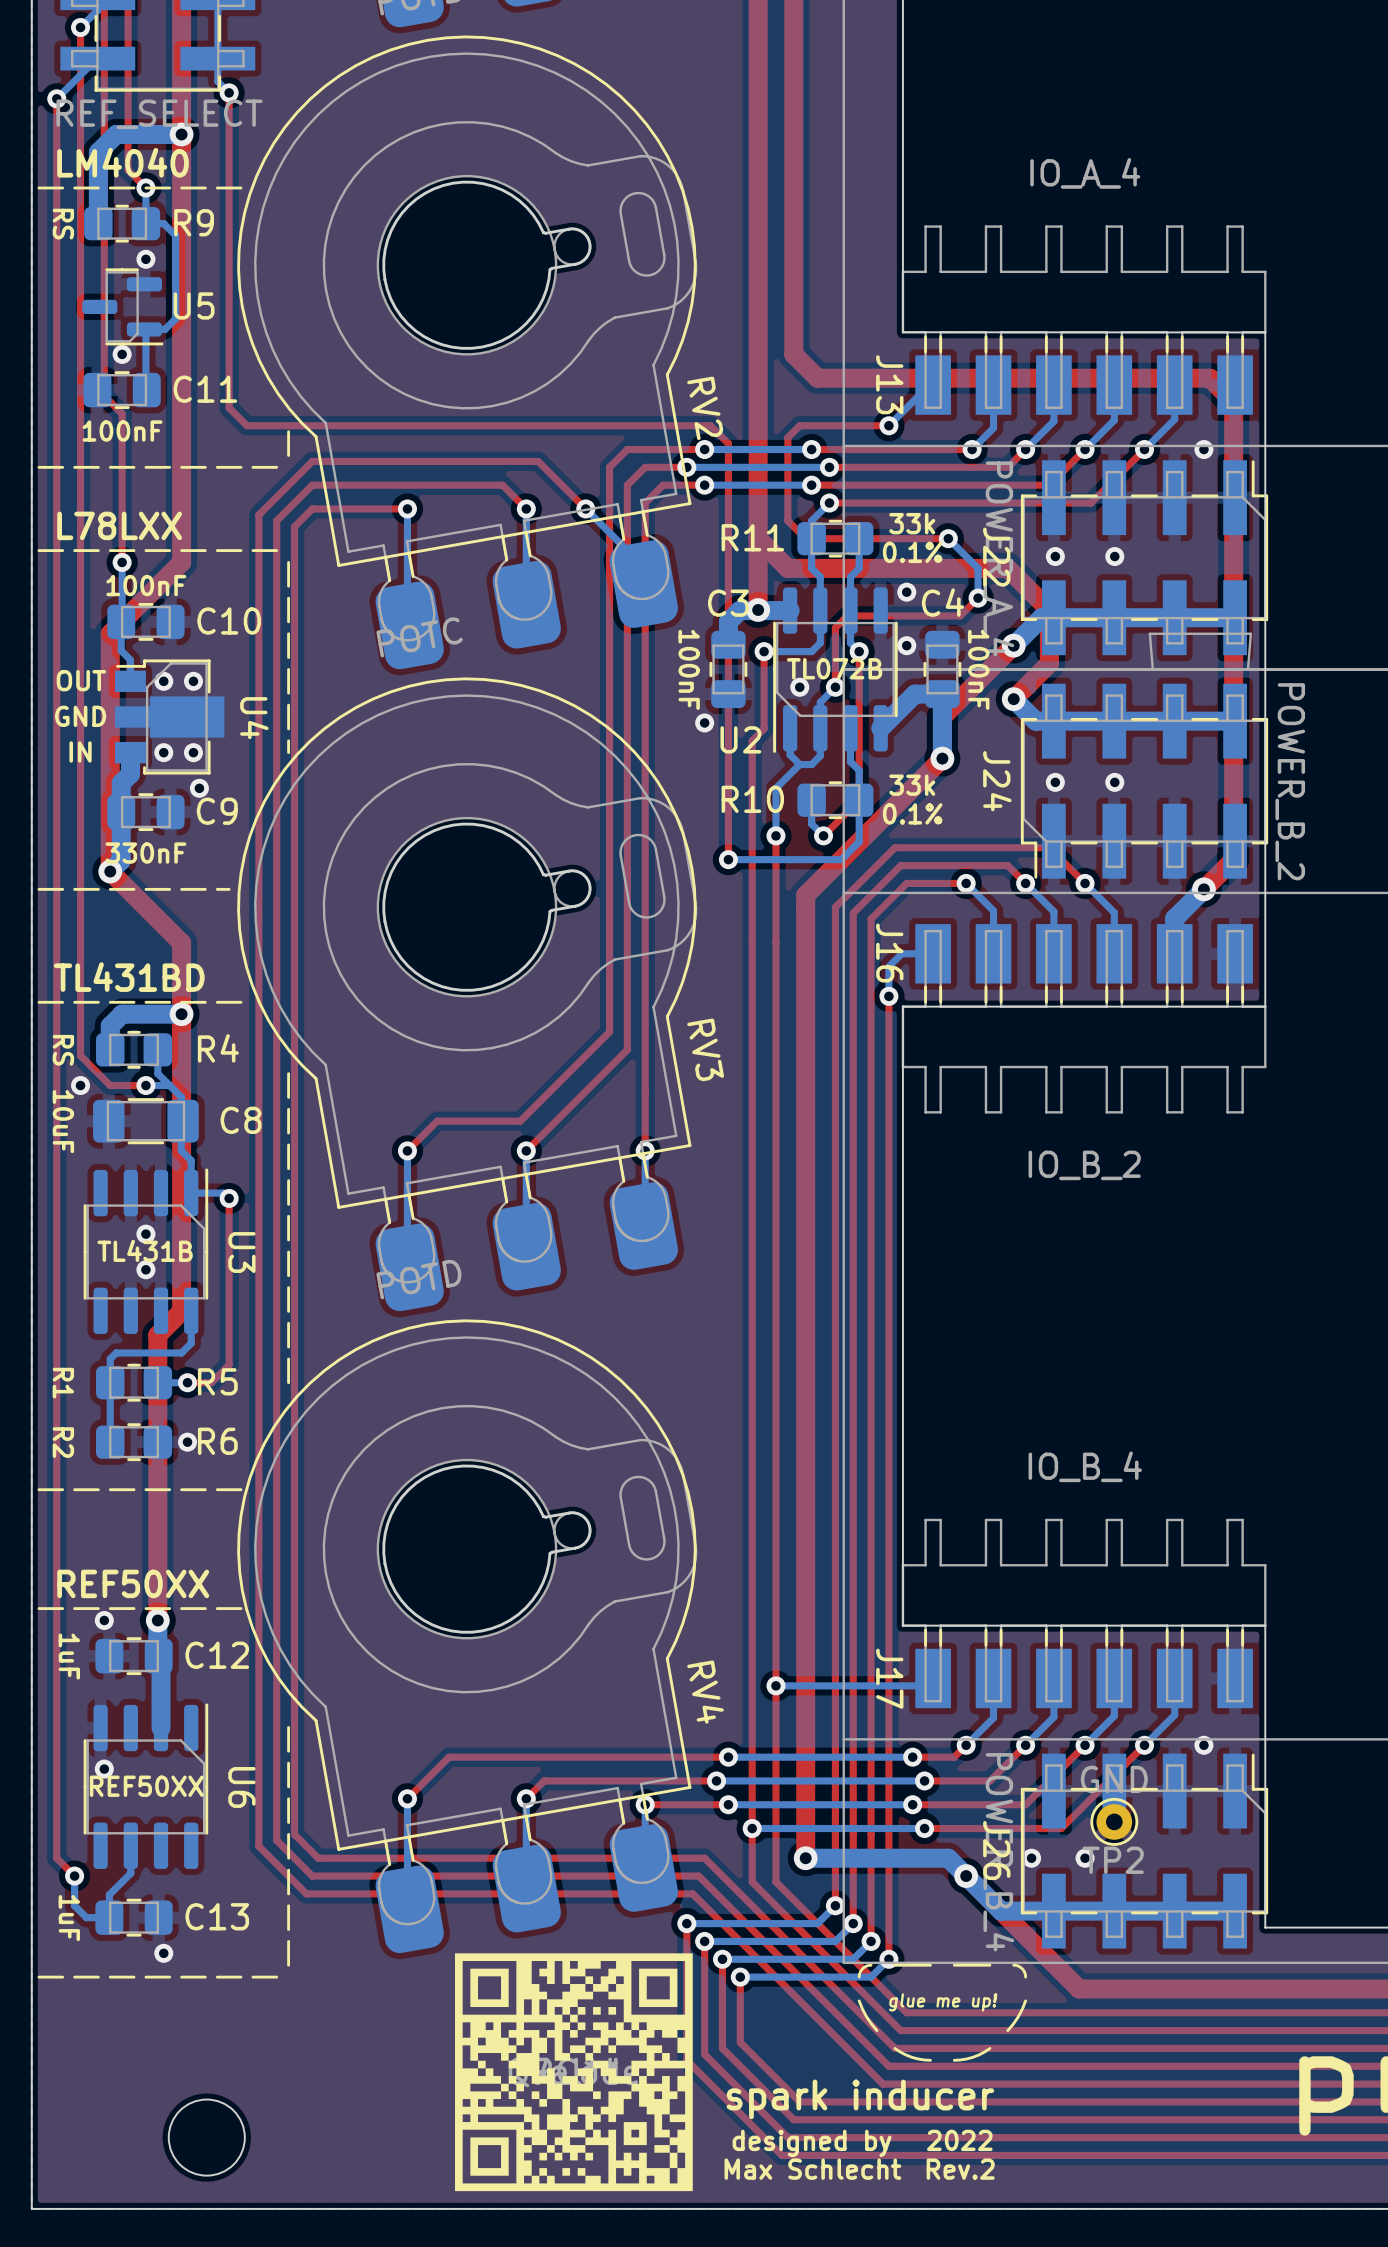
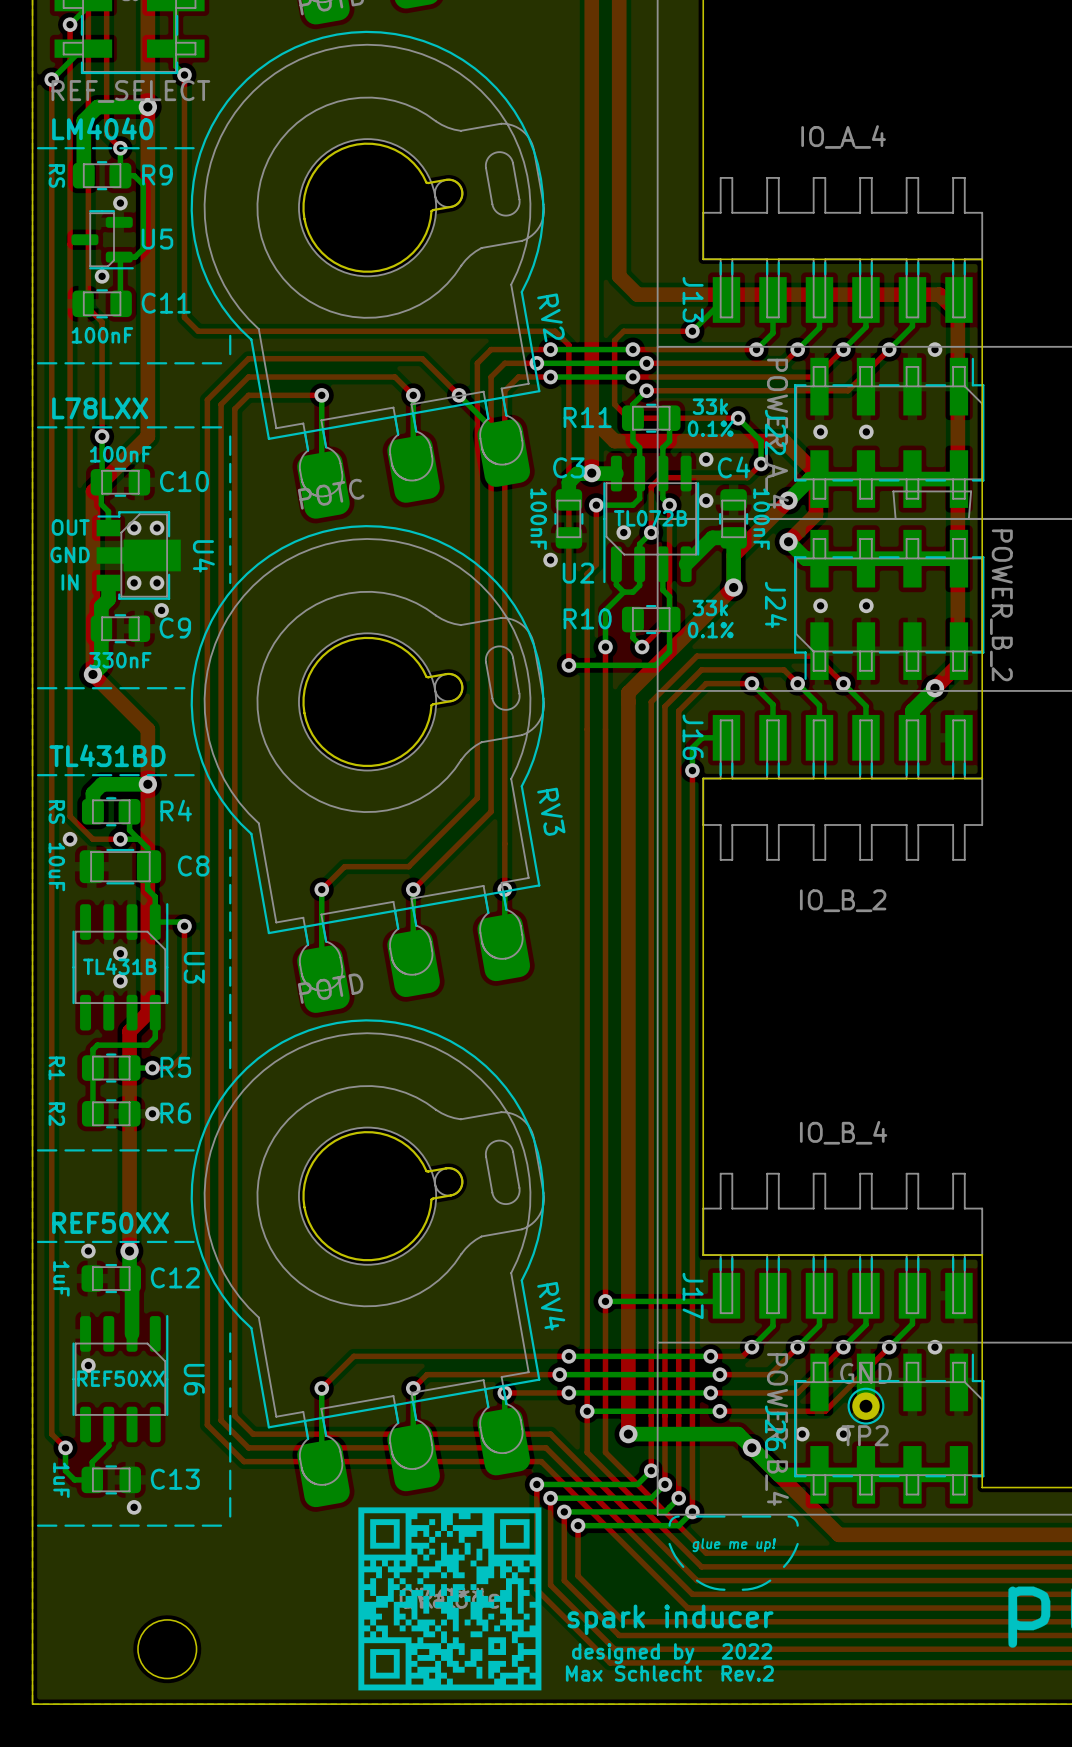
part footprint: [455, 1953, 693, 2192] -> [358, 1507, 542, 1691]

